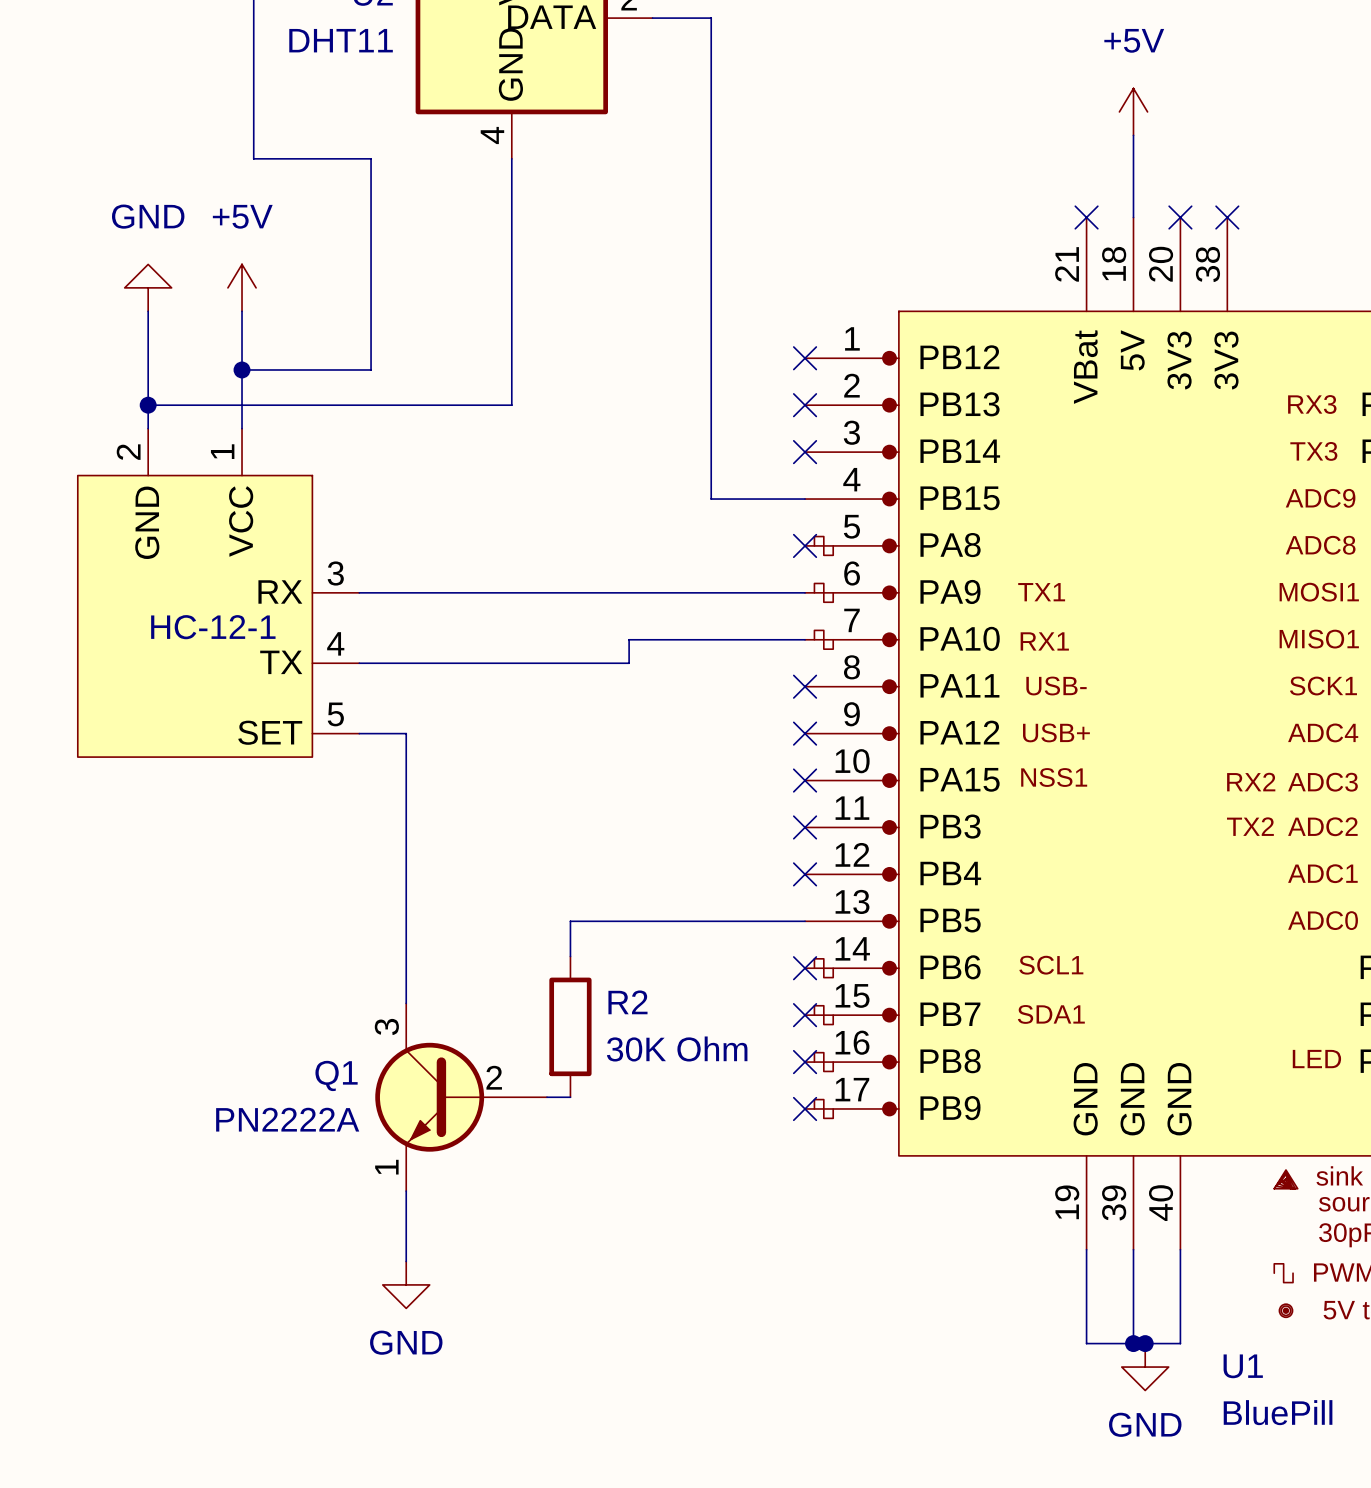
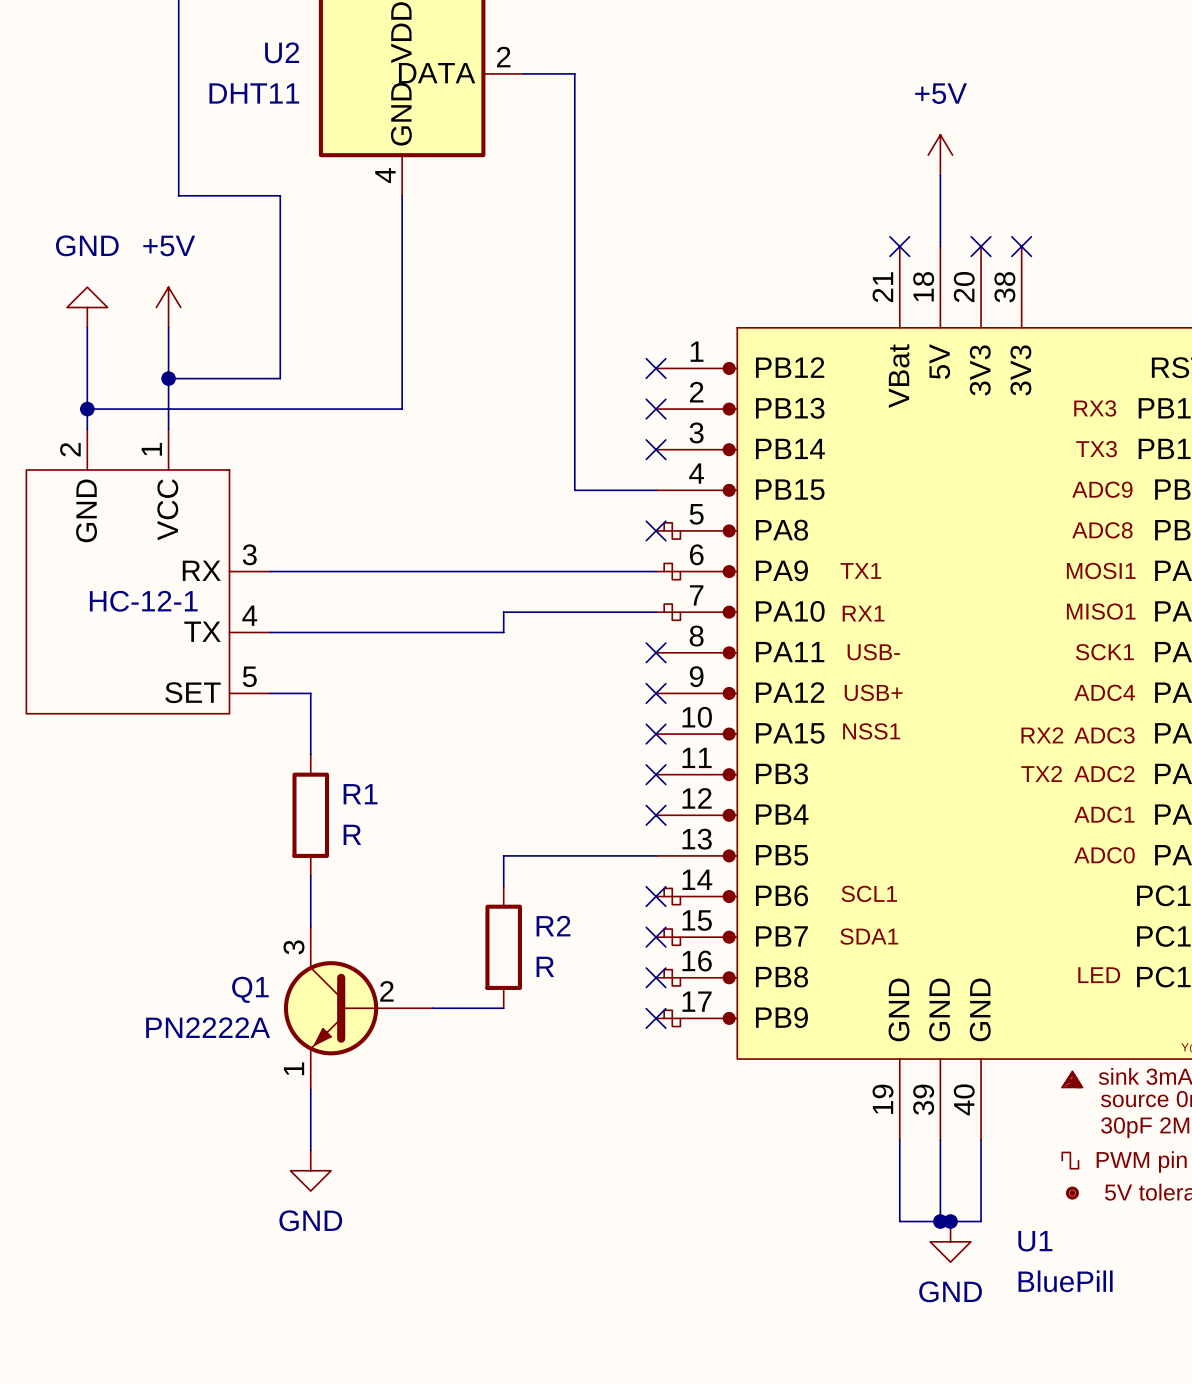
HC-12-1 symbol: [77, 428, 360, 758] -> [26, 429, 271, 714]
wire: (406, 804) (406, 944) -> none
R1: none -> R (310, 815)
wire: (629, 921) (570, 921) (570, 956) -> (503, 855) (503, 886)
R2 position: (570, 1026) -> (503, 947)
R2 value: 30K Ohm (677, 1049) -> R (545, 966)
wire: none -> (452, 1008) (503, 1008)

